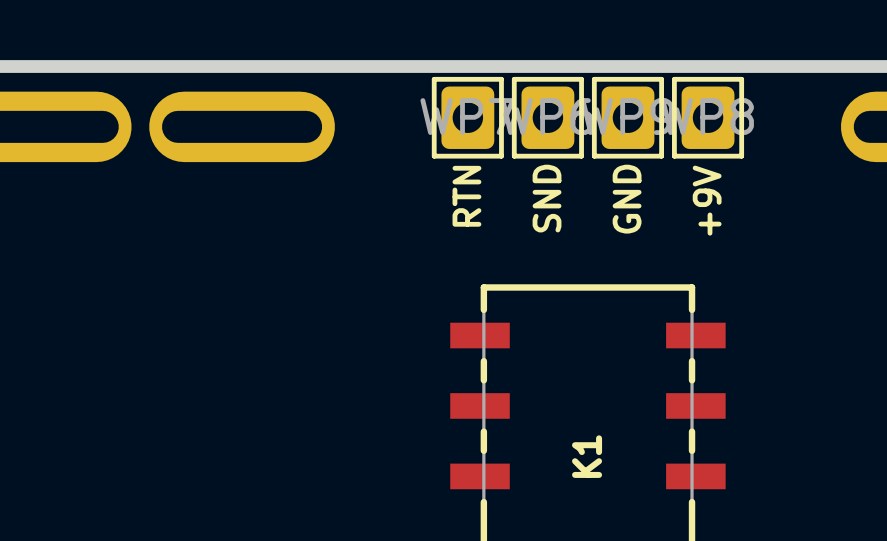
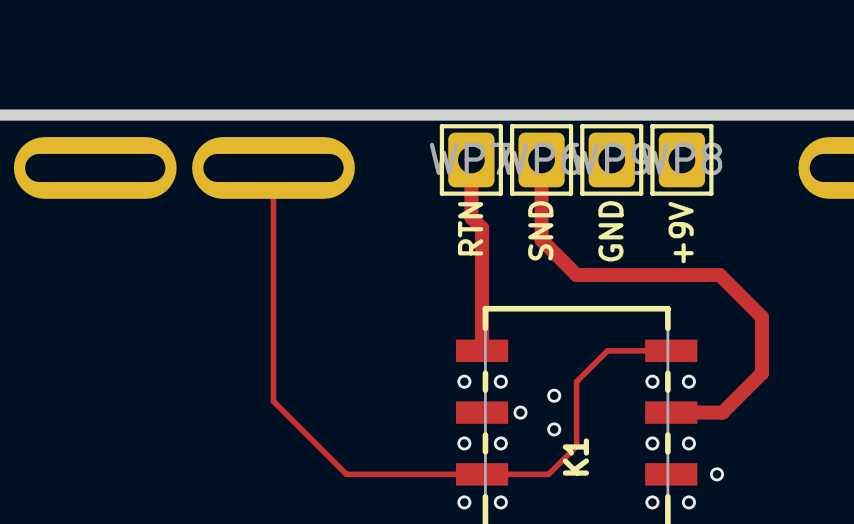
track: none -> (471, 159) (471, 217) (482, 228) (482, 350)
track: none -> (541, 159) (541, 239) (576, 275) (719, 275) (761, 317) (761, 373) (722, 412) (671, 412)
track: none -> (273, 167) (273, 401) (346, 474) (548, 474) (576, 446) (576, 381) (607, 350) (671, 350)
via: none -> (464, 381)
via: none -> (500, 381)
via: none -> (652, 381)
via: none -> (688, 381)
via: none -> (554, 395)
via: none -> (520, 412)
via: none -> (554, 429)
via: none -> (464, 443)
via: none -> (500, 443)
via: none -> (652, 443)
via: none -> (688, 443)
via: none -> (717, 474)
via: none -> (464, 502)
via: none -> (500, 502)
via: none -> (652, 502)
via: none -> (688, 502)

